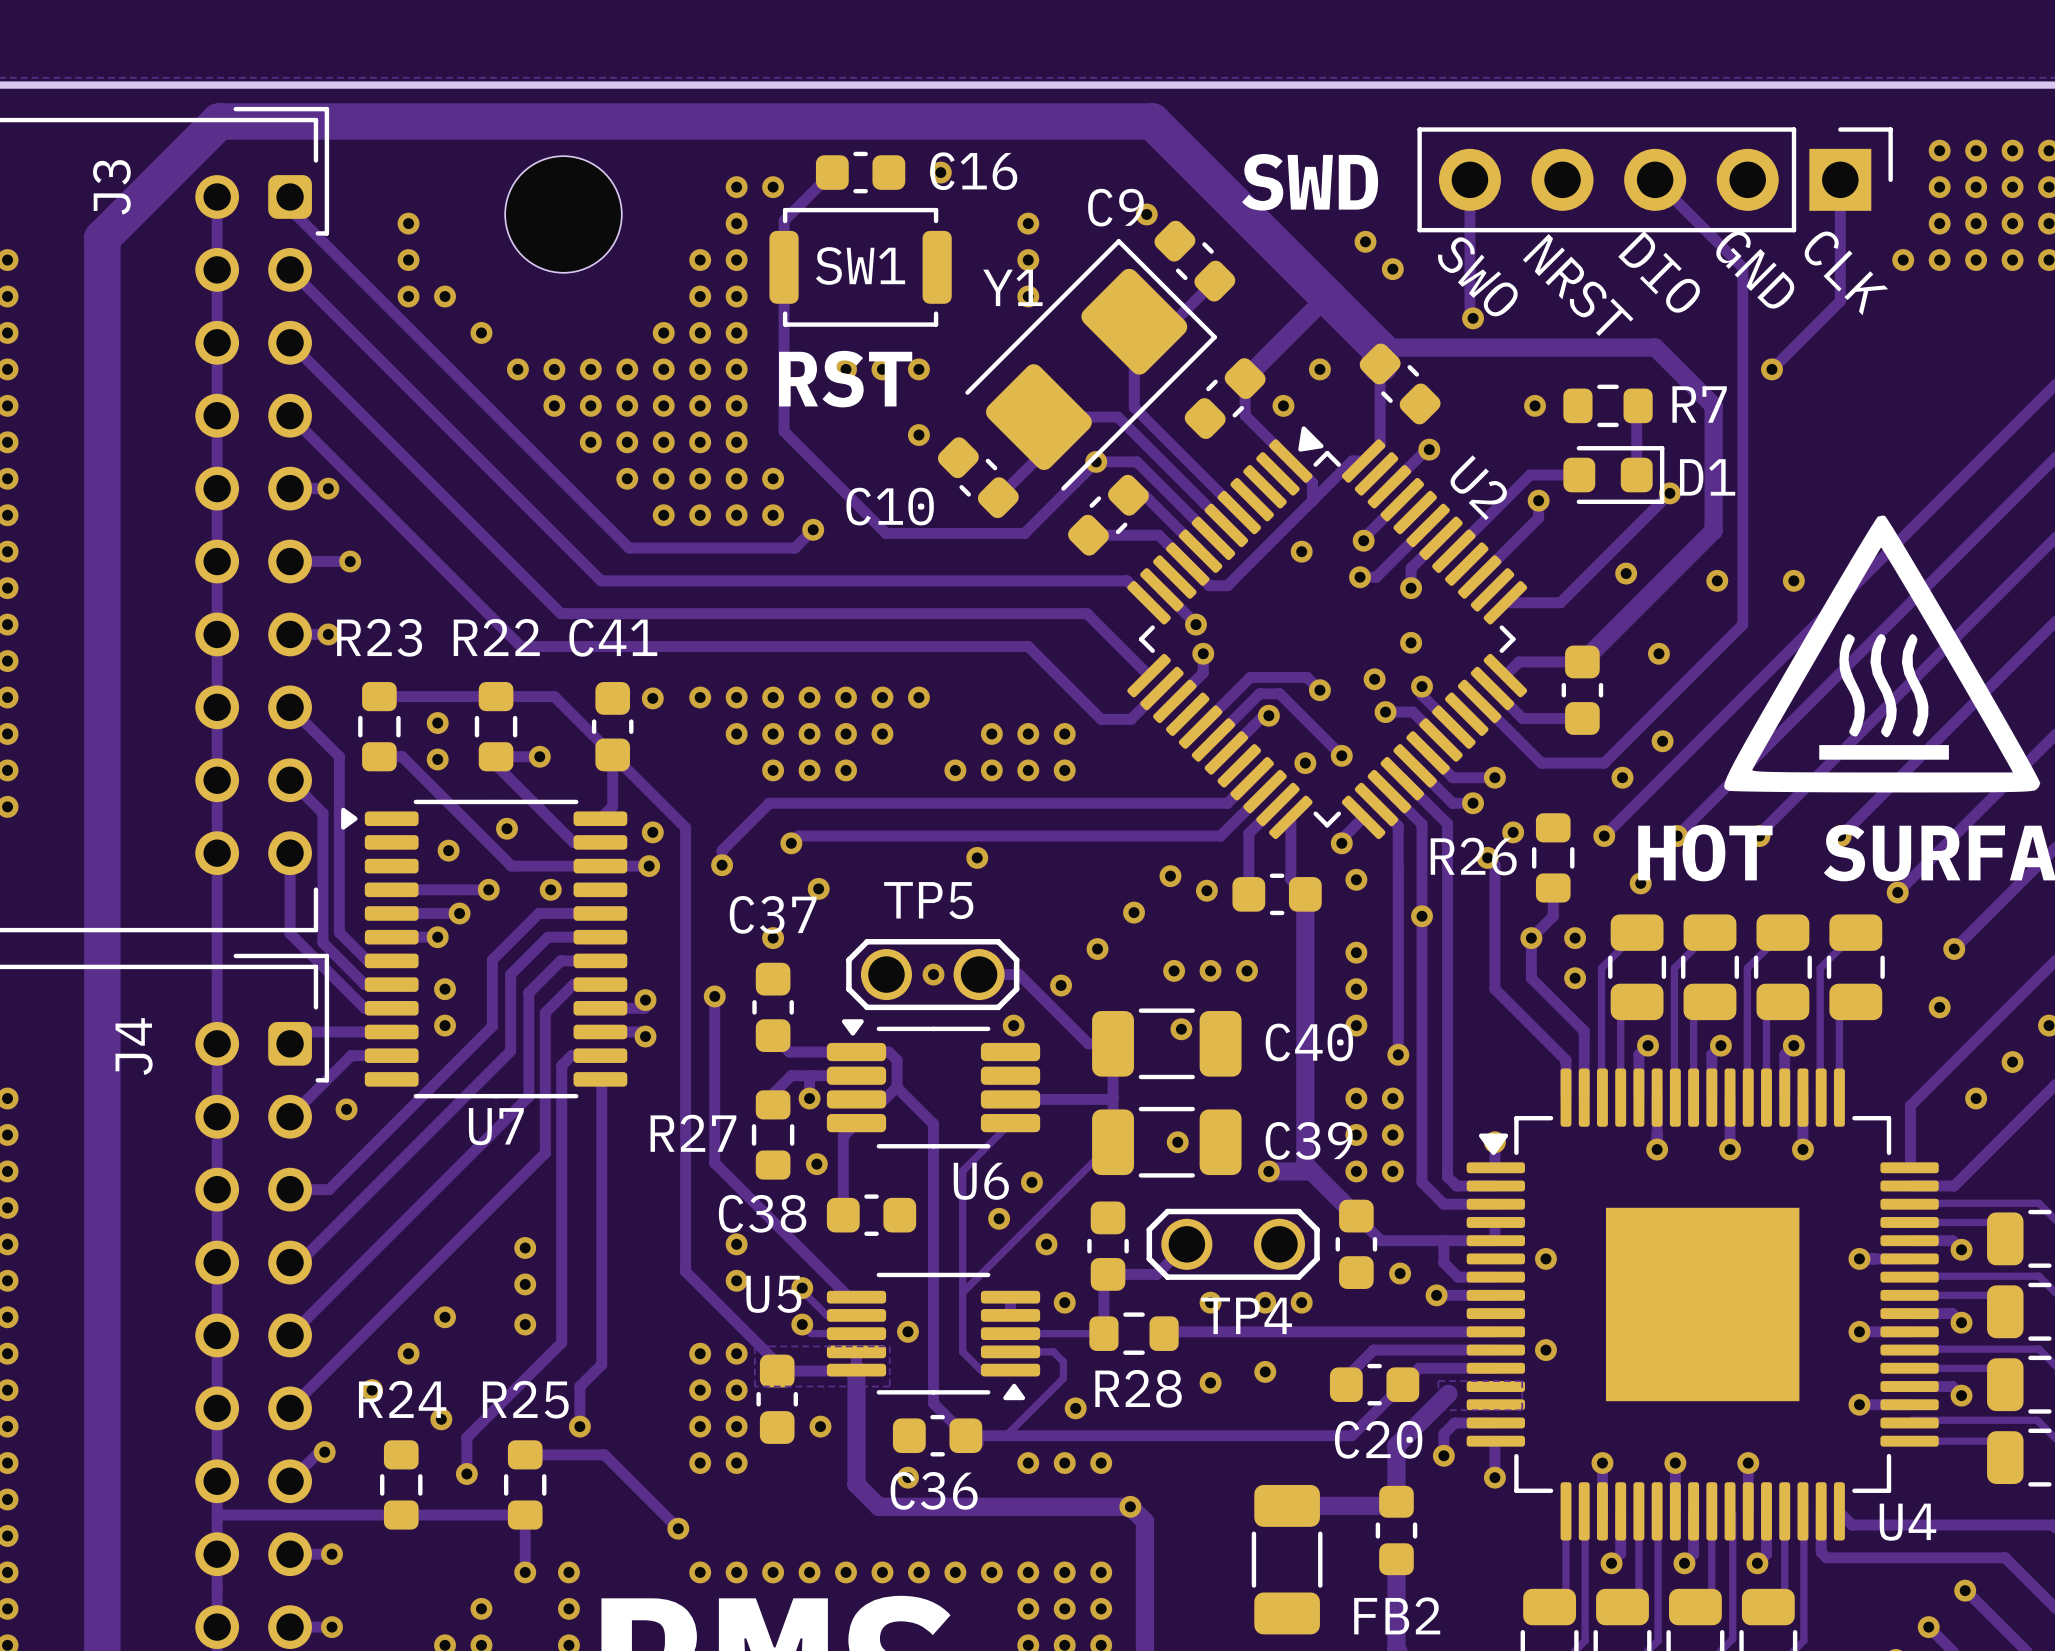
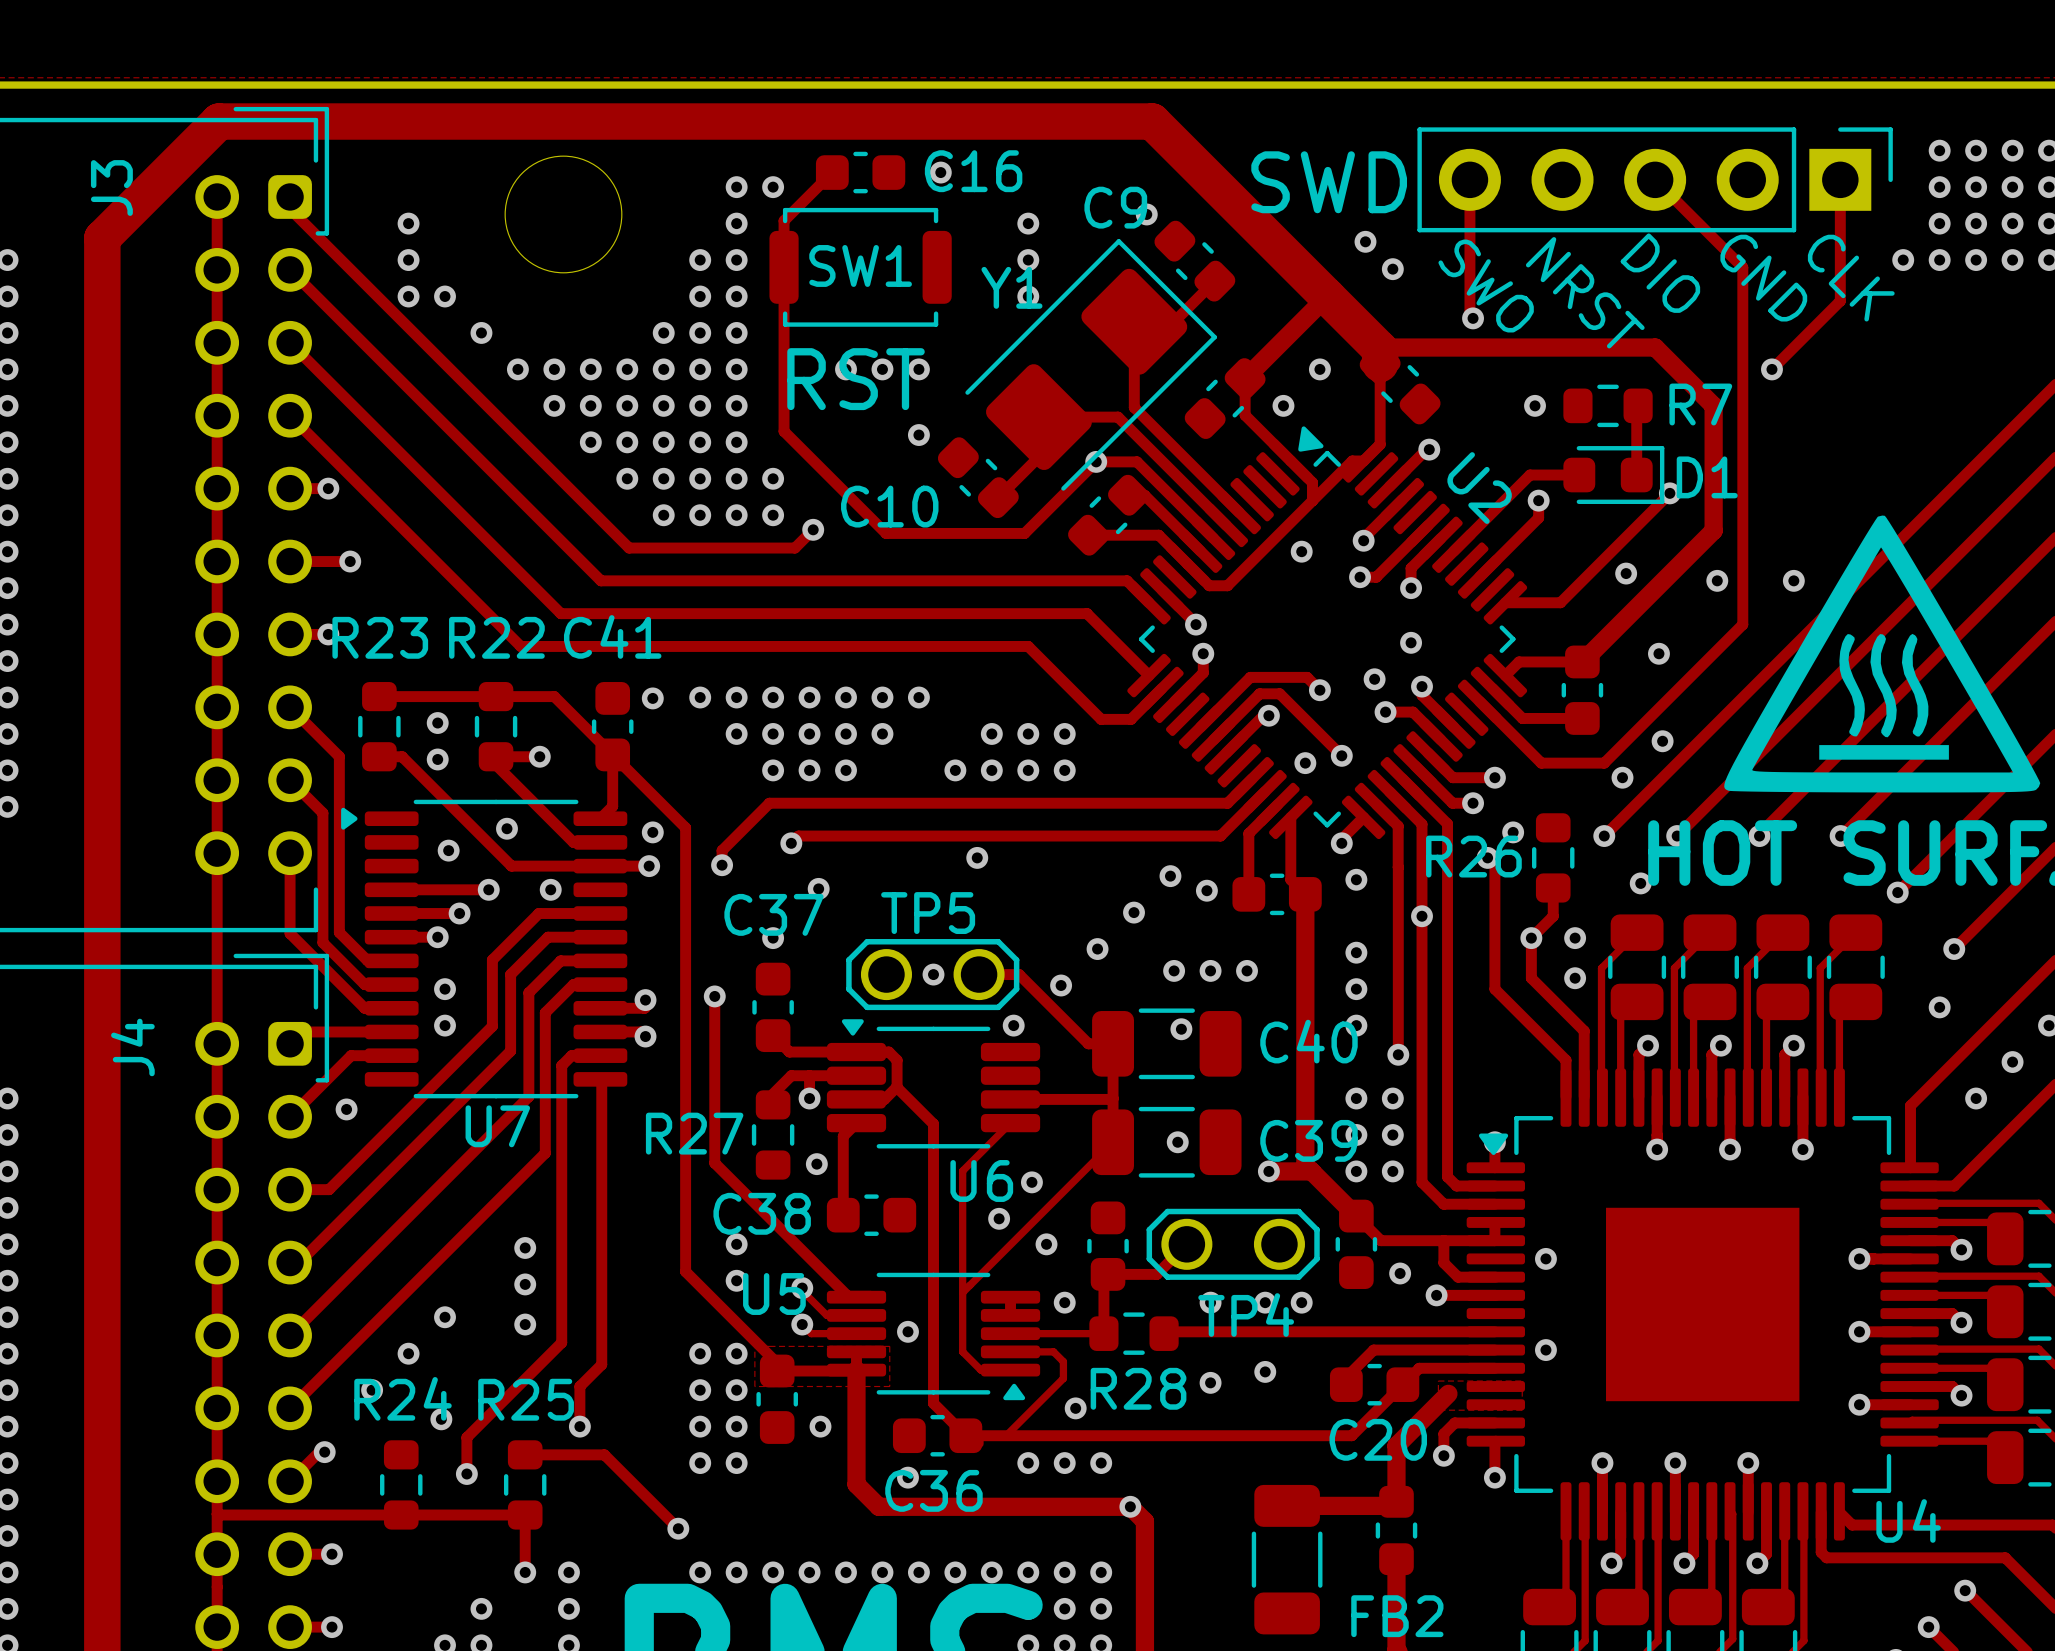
TP5 name position: TP5 (928, 900) -> TP5 (928, 913)

